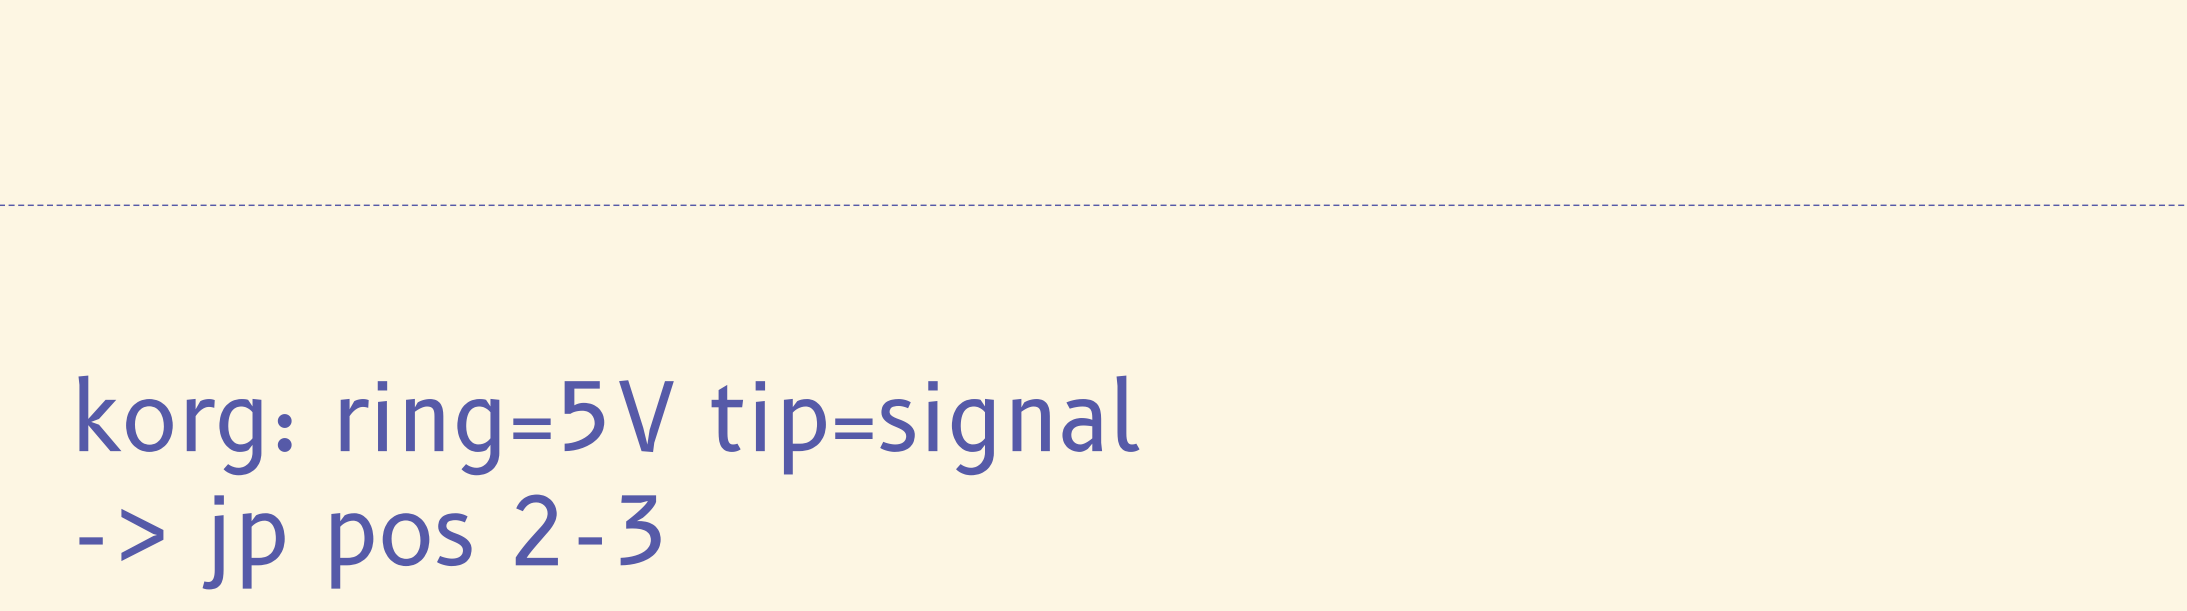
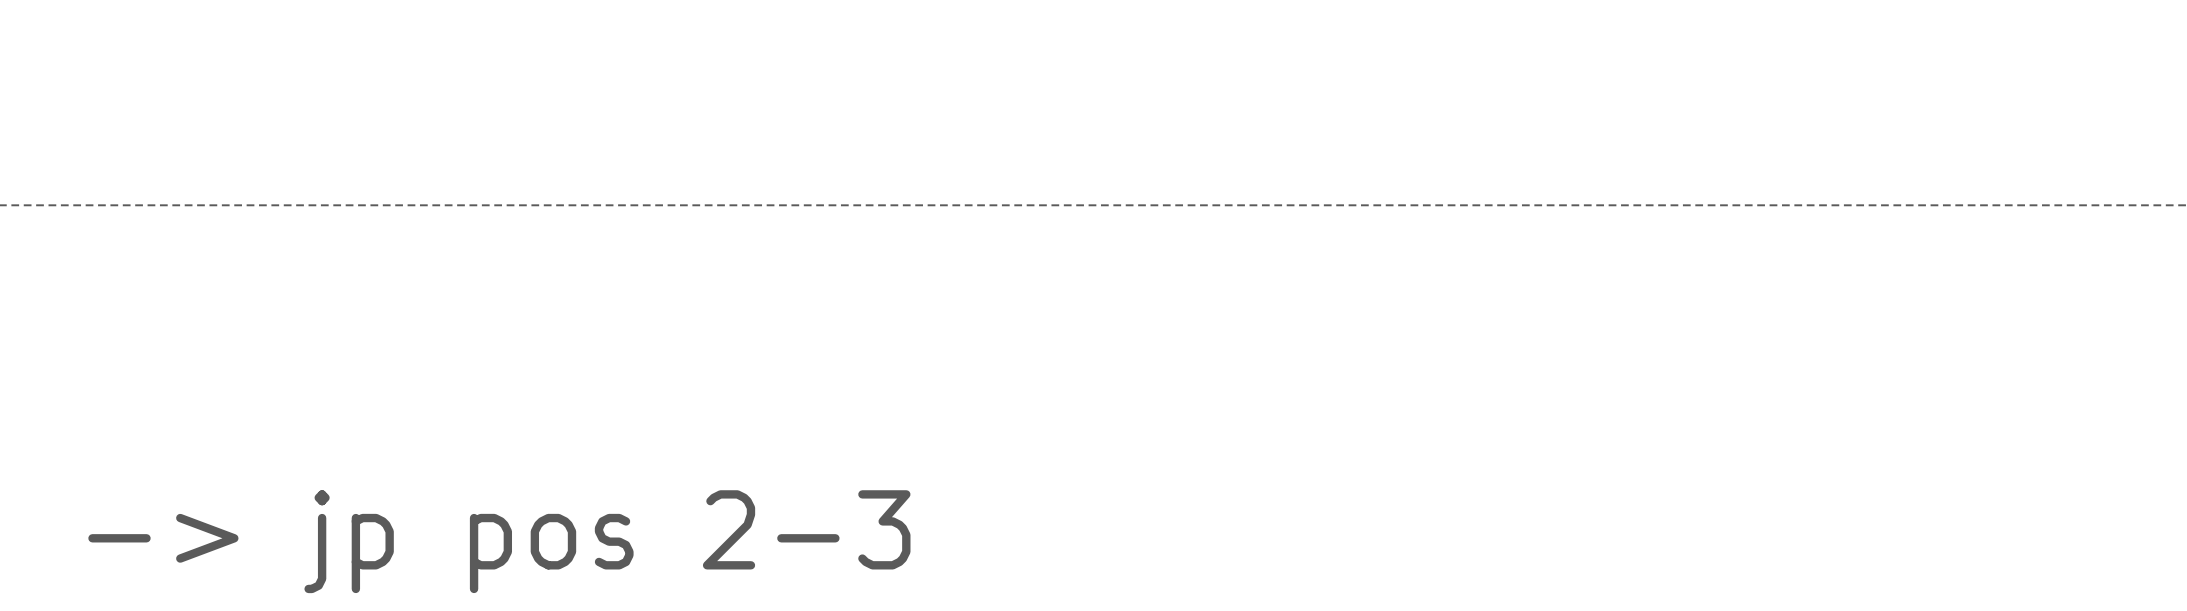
text: korg: ring=5V tip=signal (609, 425) -> none

